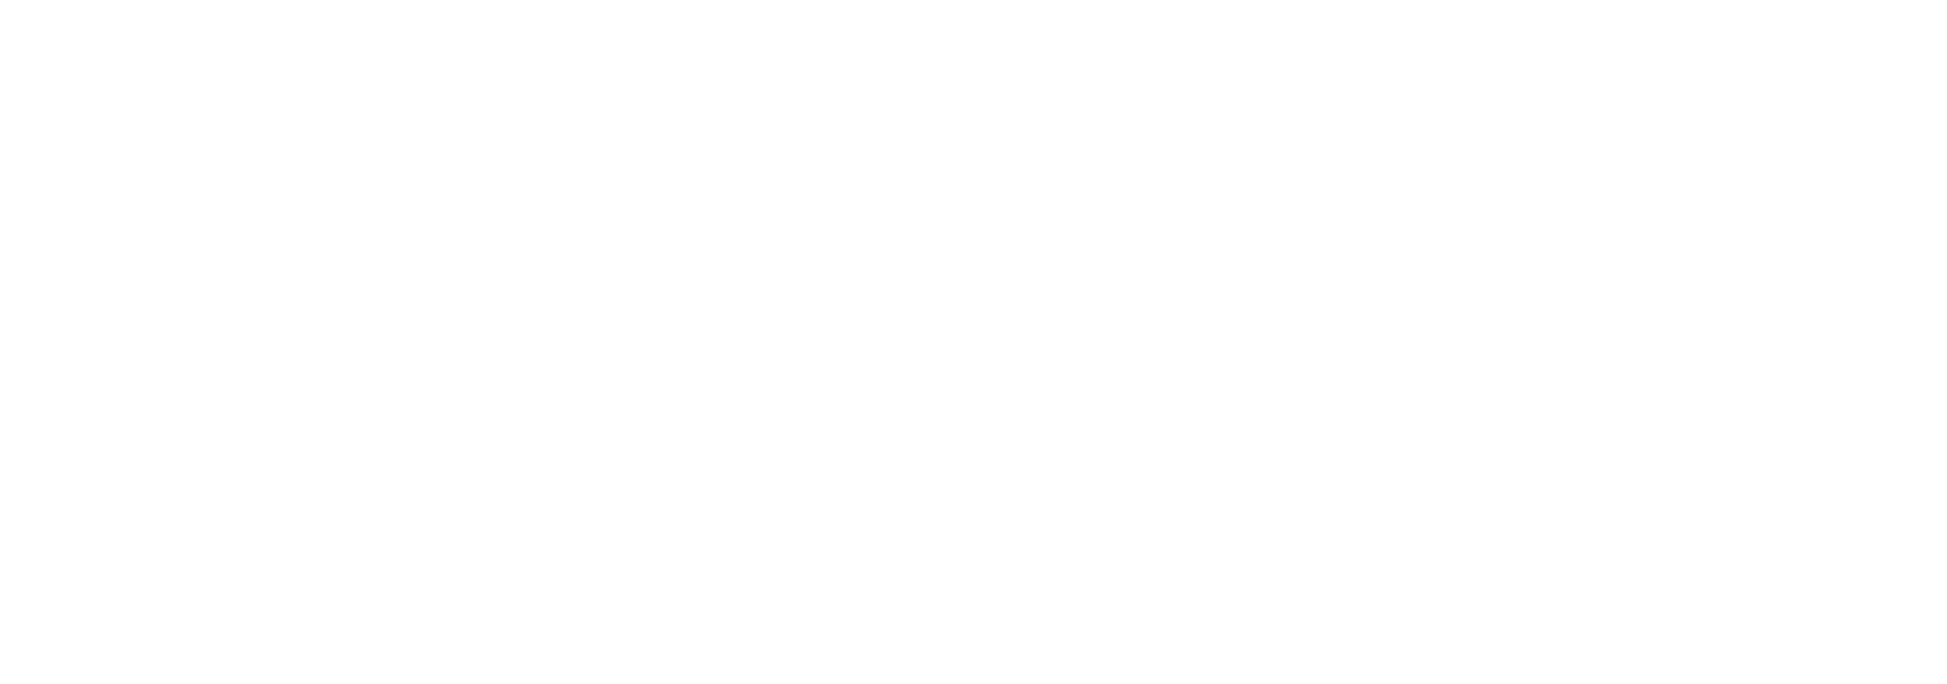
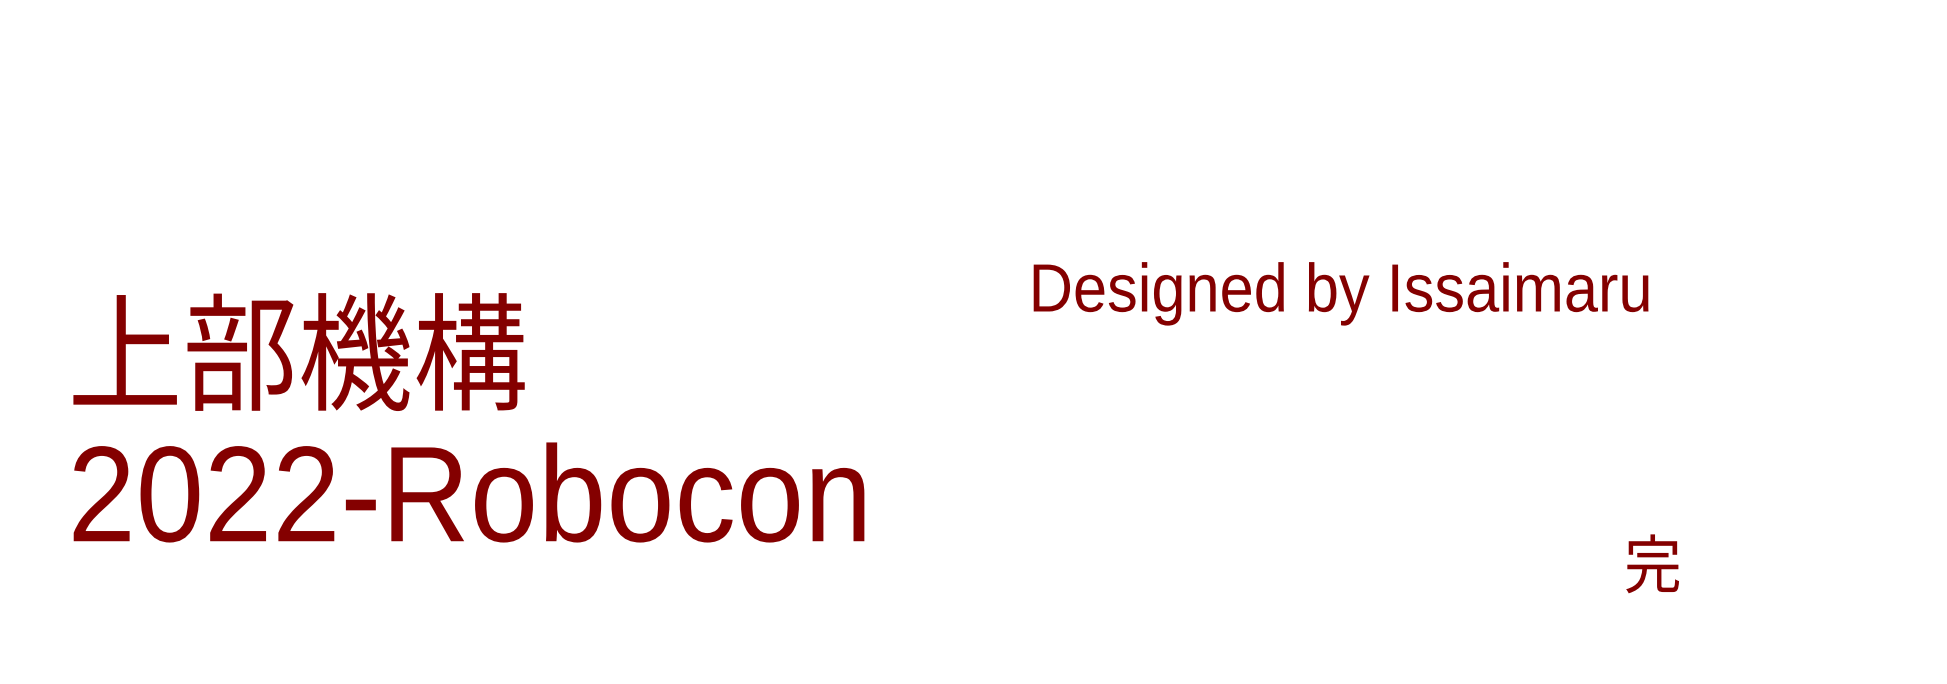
text: none -> Designed by Issaimaru (1341, 293)
text: none -> 上部機構 (299, 352)
text: none -> 2022-Robocon (469, 492)
text: none -> 完 (1652, 563)

